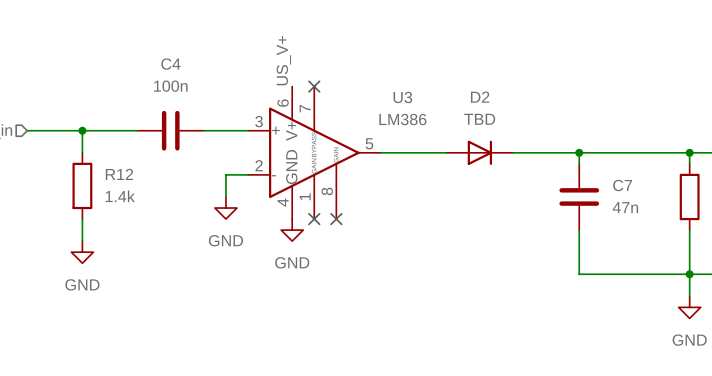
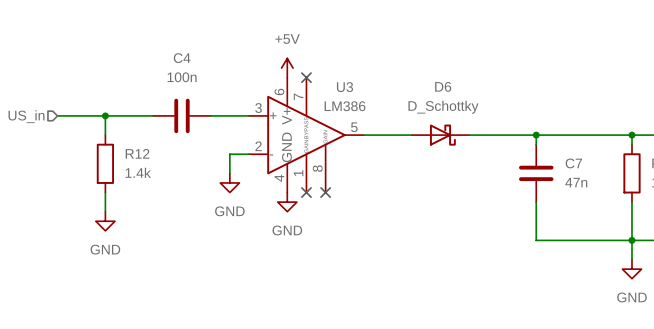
label: US_V+ (283, 60) -> none
power symbol: none -> +5V (287, 68)
U3 name position: U3 (402, 97) -> U3 (344, 87)
U3 value position: LM386 (402, 119) -> LM386 (345, 106)
D6: none -> D_Schottky (440, 135)
D2: TBD (479, 152) -> none

